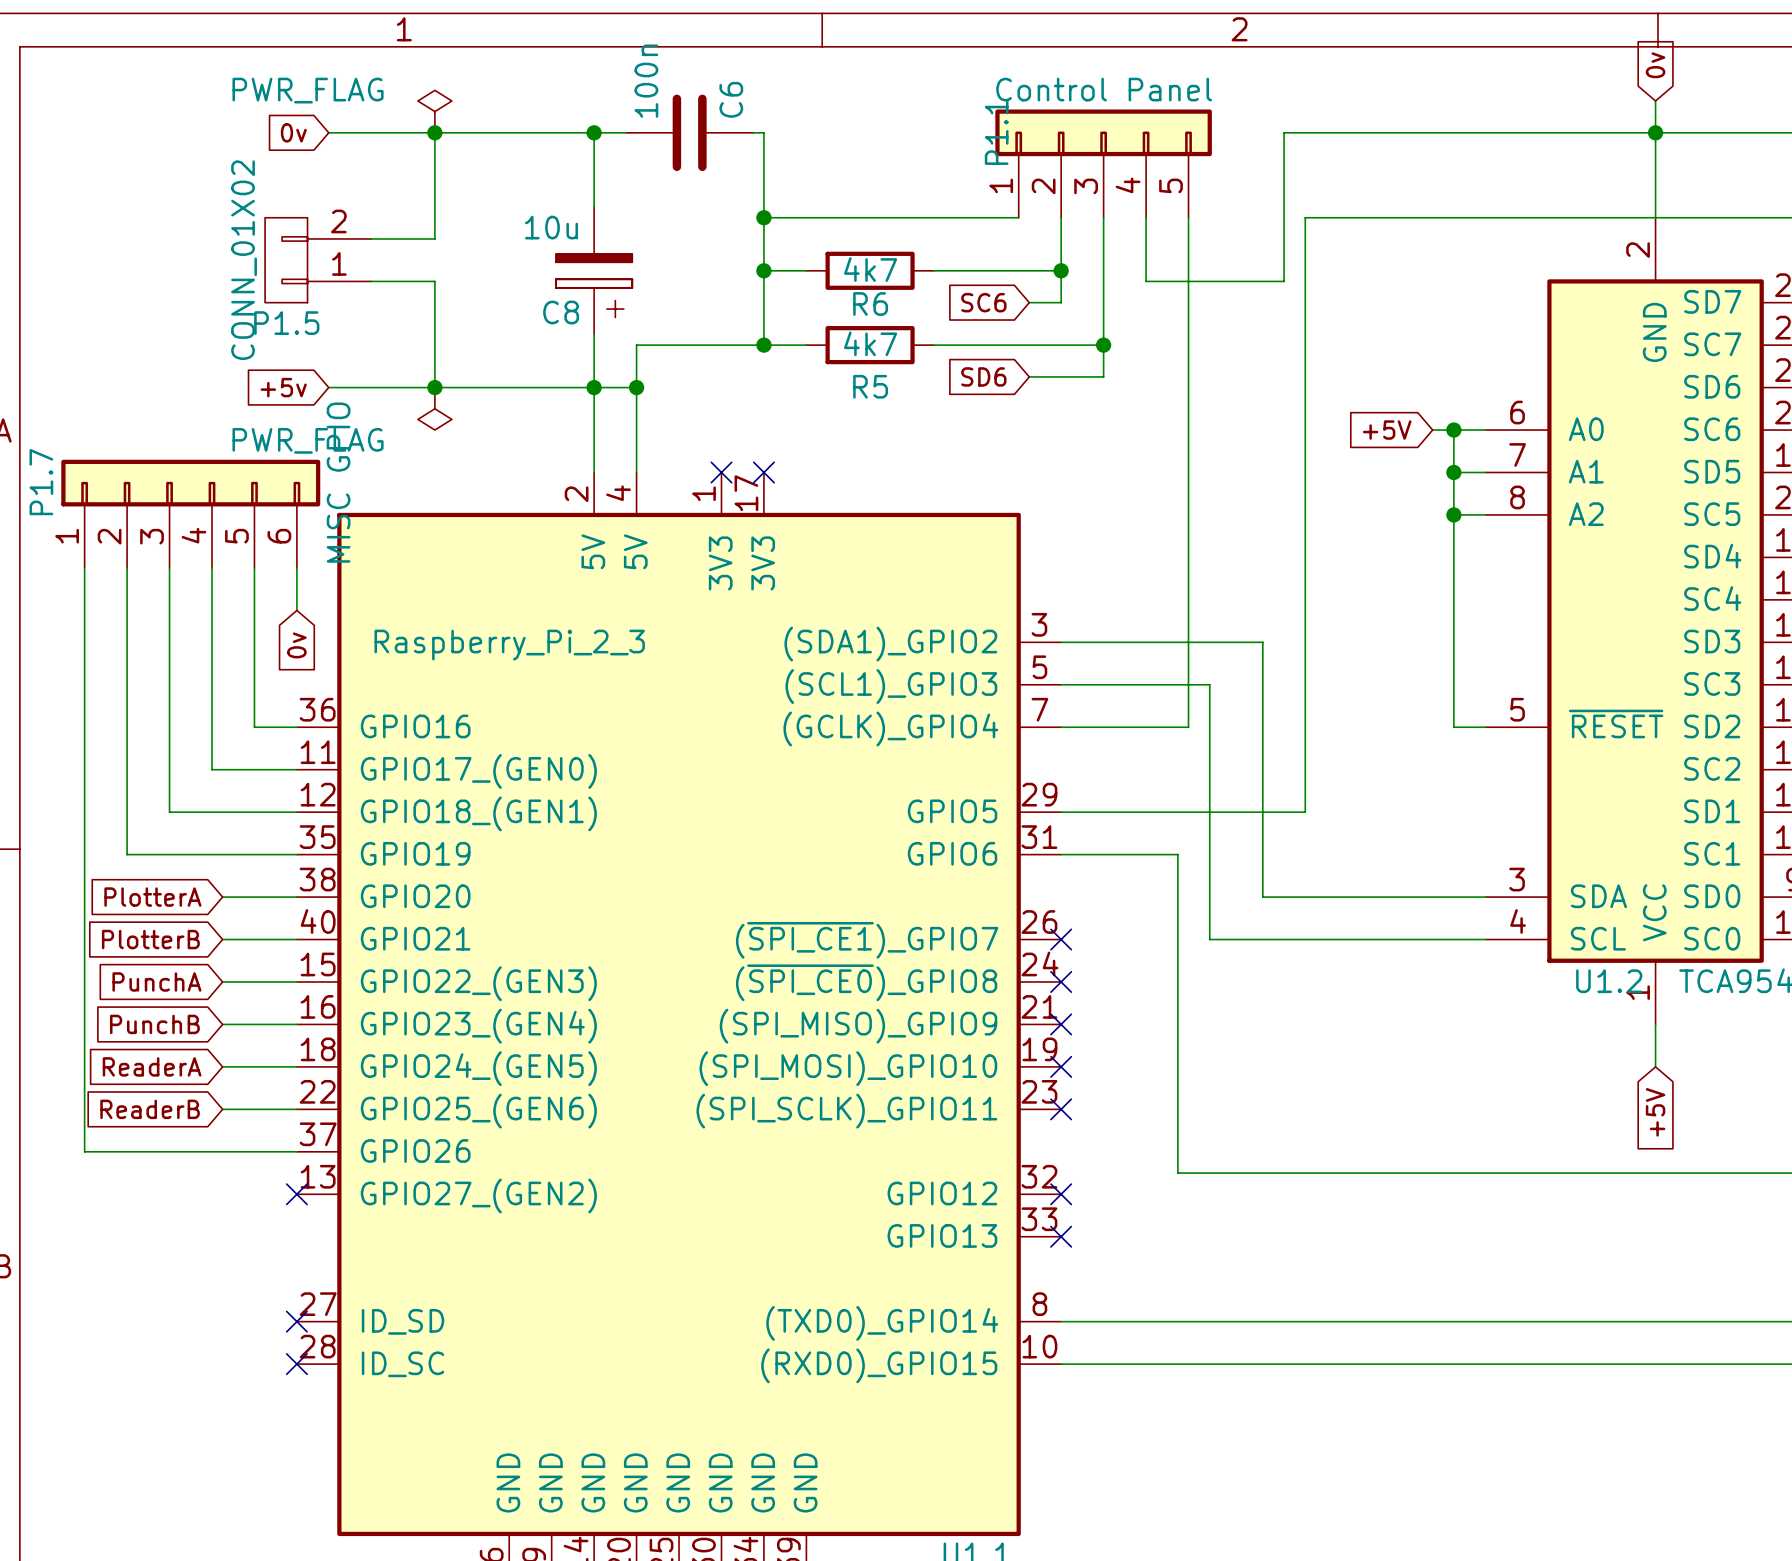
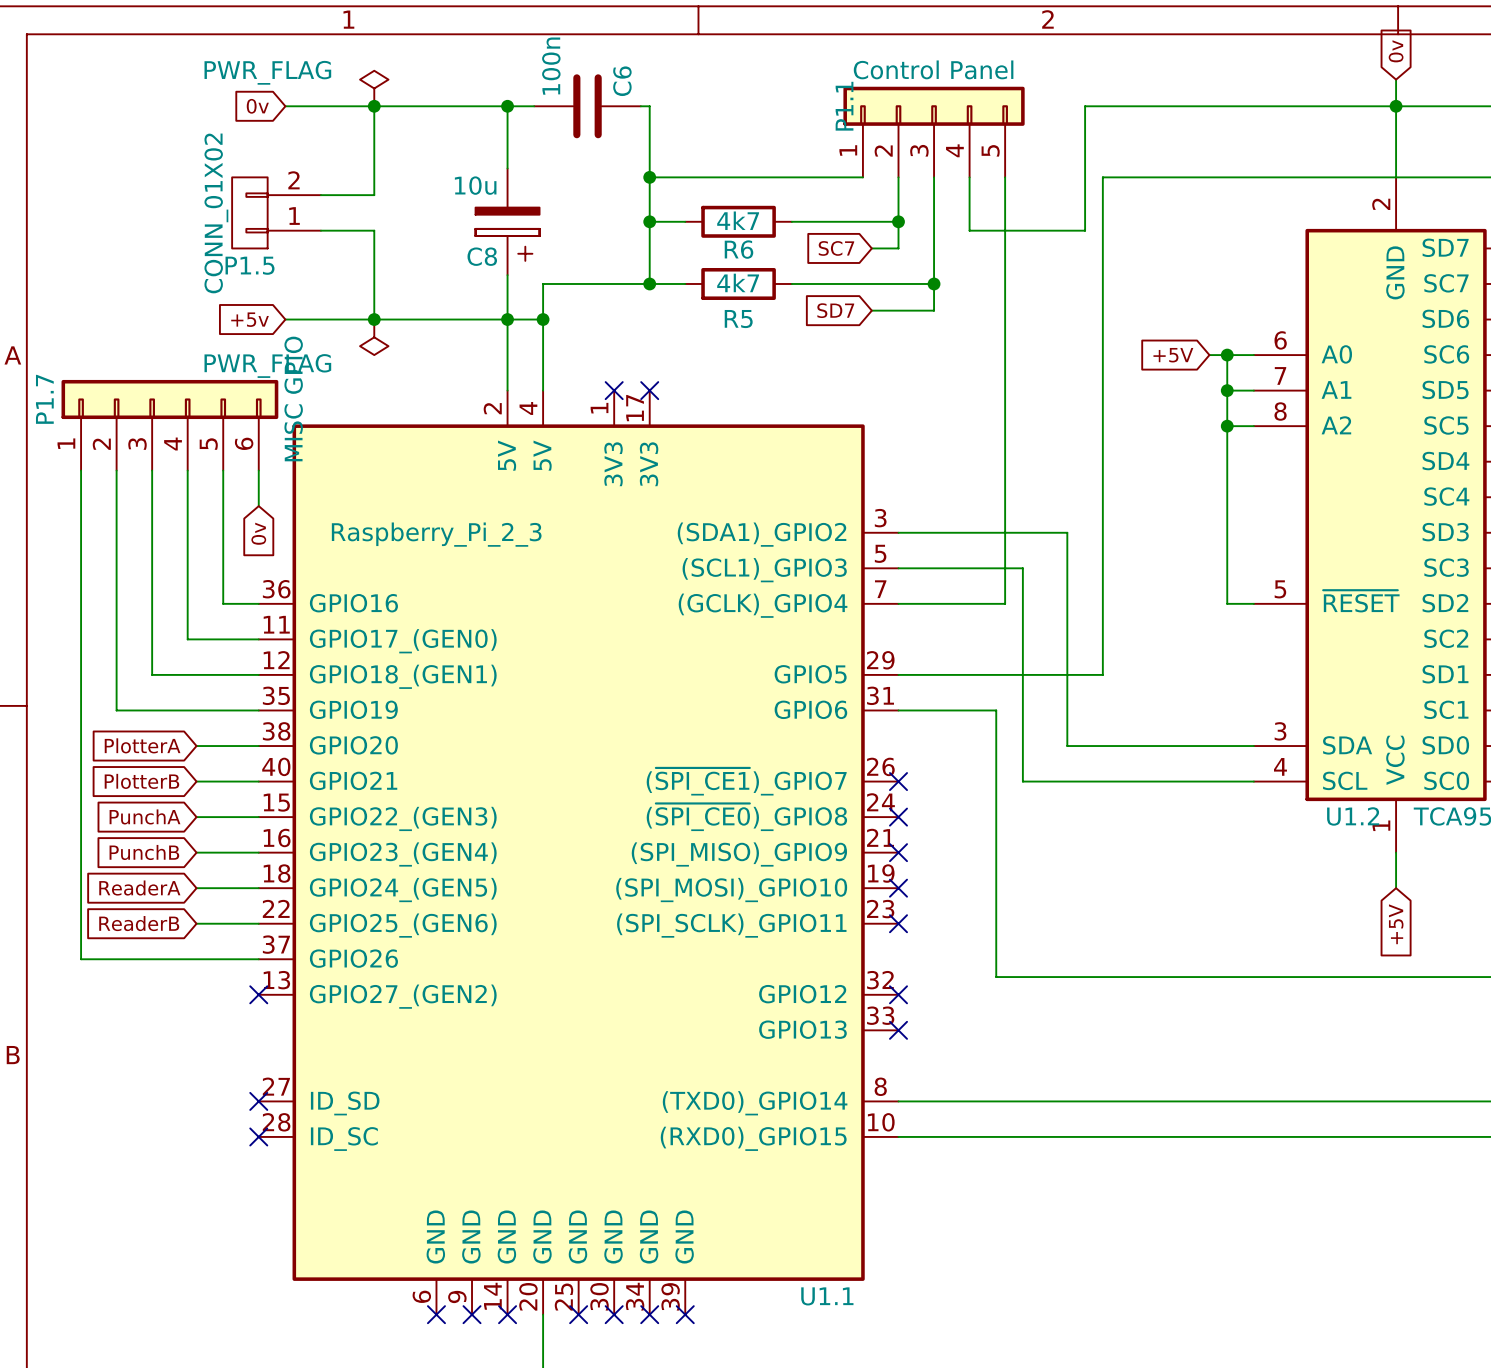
global label: SC6 (983, 302) -> SC7 (836, 248)
global label: SD6 (983, 376) -> SD7 (835, 310)

